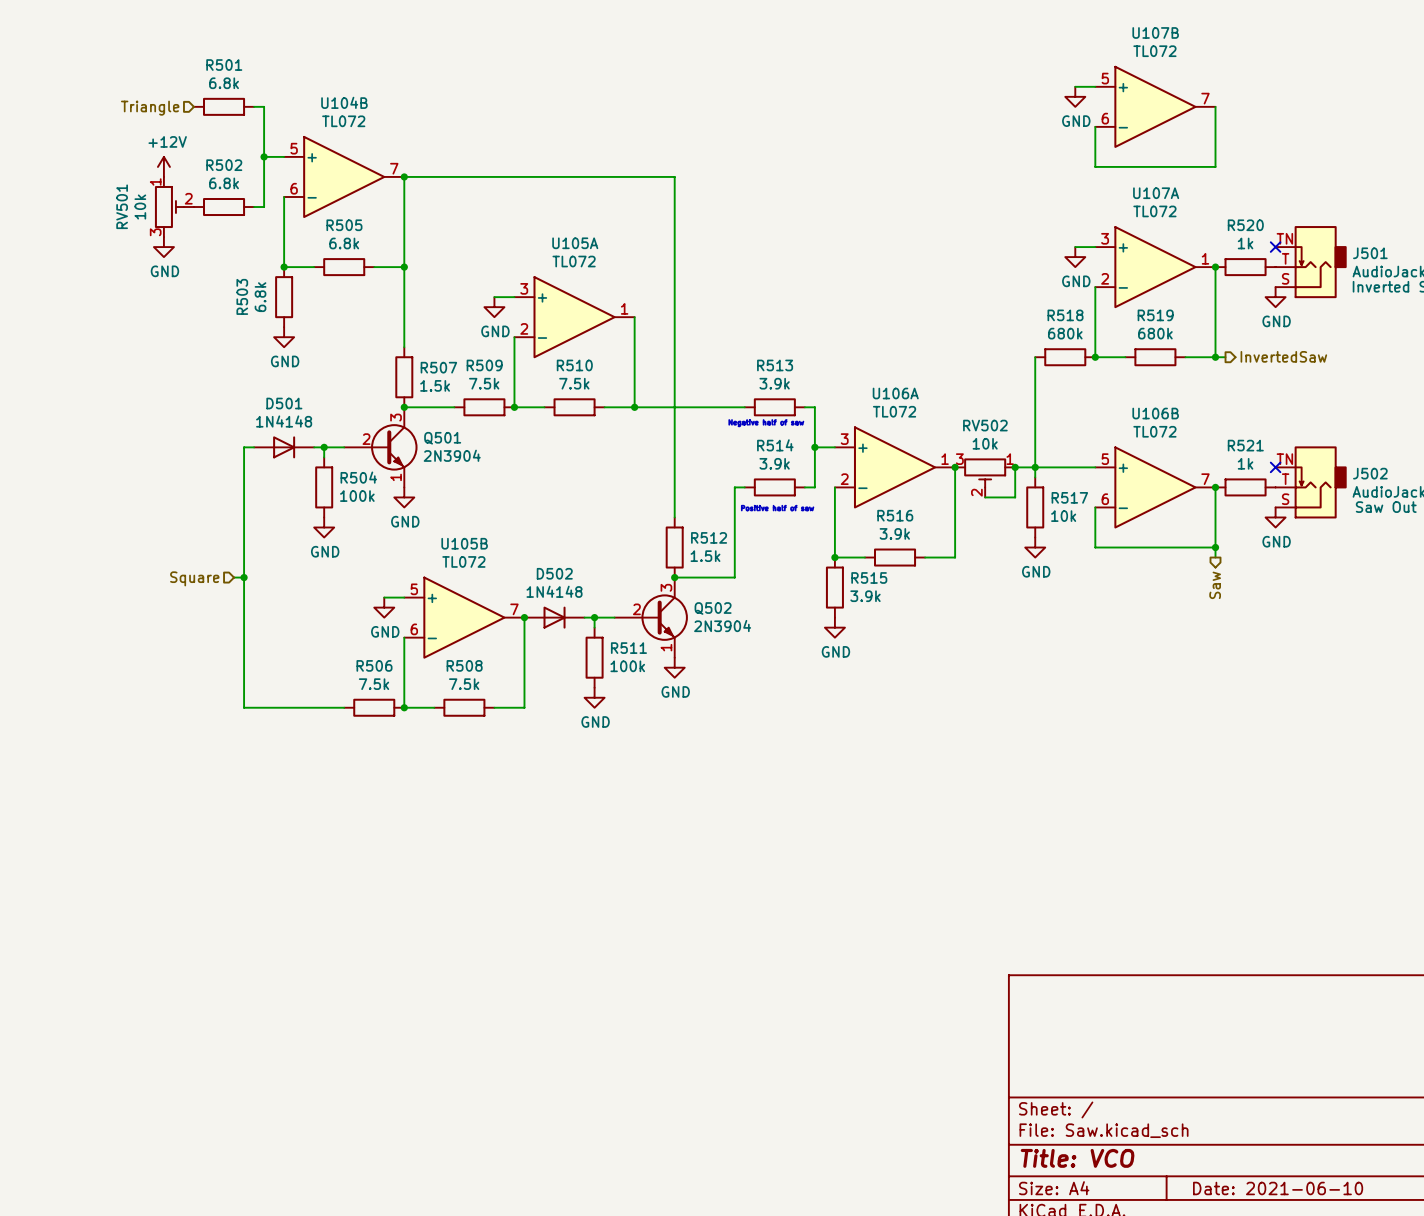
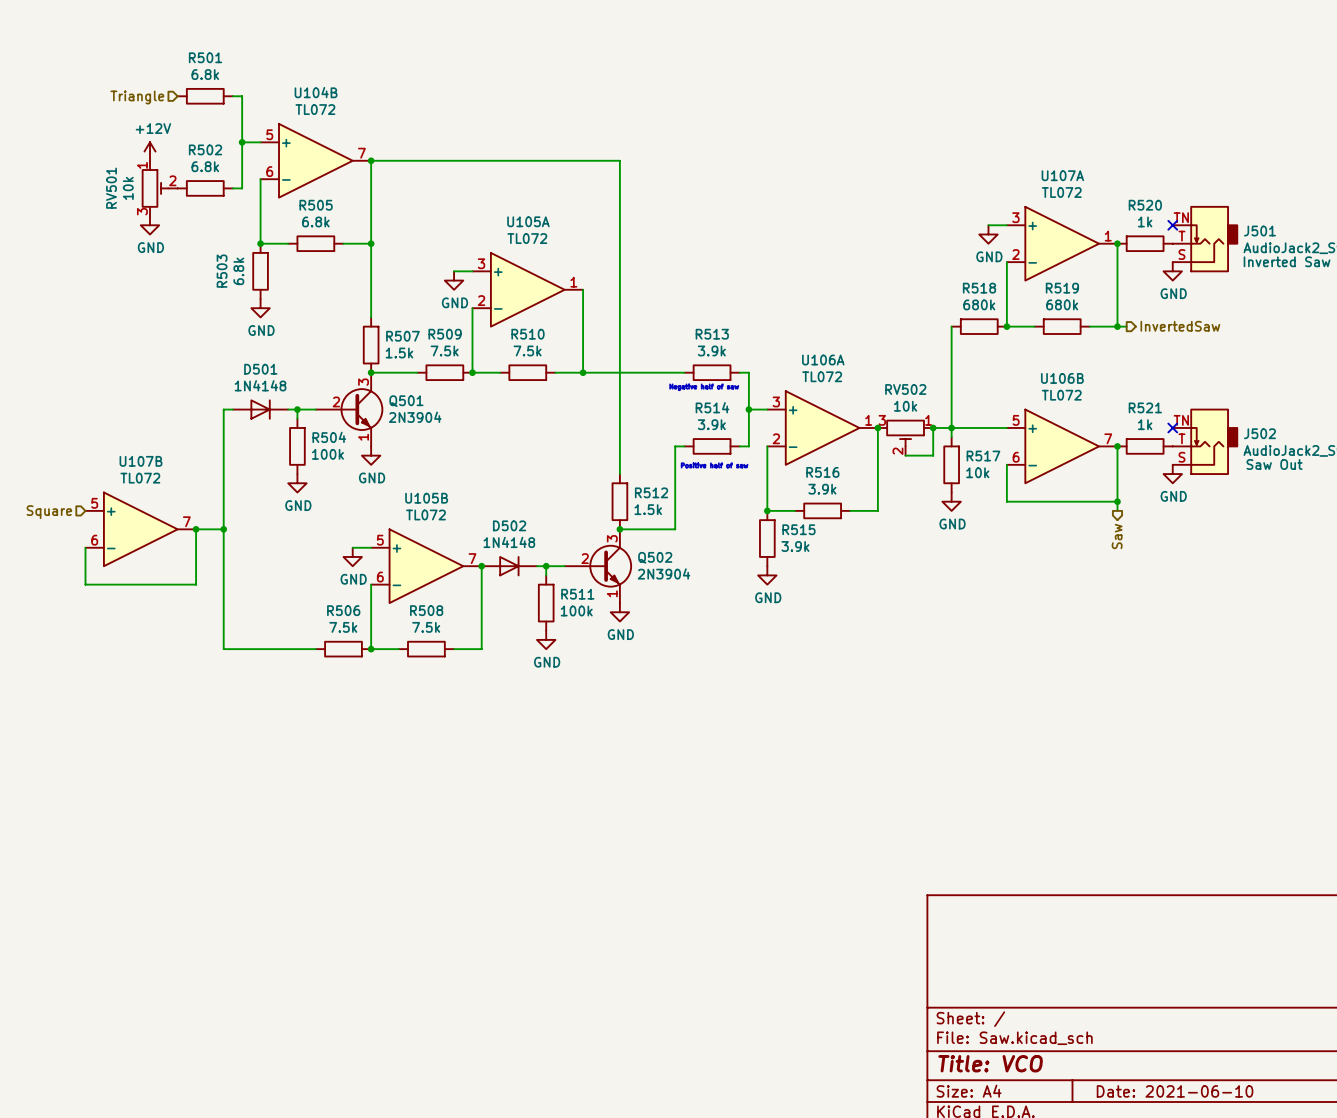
wire: (1075, 86) (1095, 86) -> none
power symbol: GND (1075, 96) -> none
U107B position: (1155, 106) -> (140, 529)
wire: (1215, 106) (1215, 166) (1095, 166) (1095, 126) -> none
junction: none -> (196, 529)
wire: none -> (214, 529) (196, 529) (196, 584) (85, 584) (85, 547)
hierarchical label position: Square (194, 578) -> Square (49, 512)

